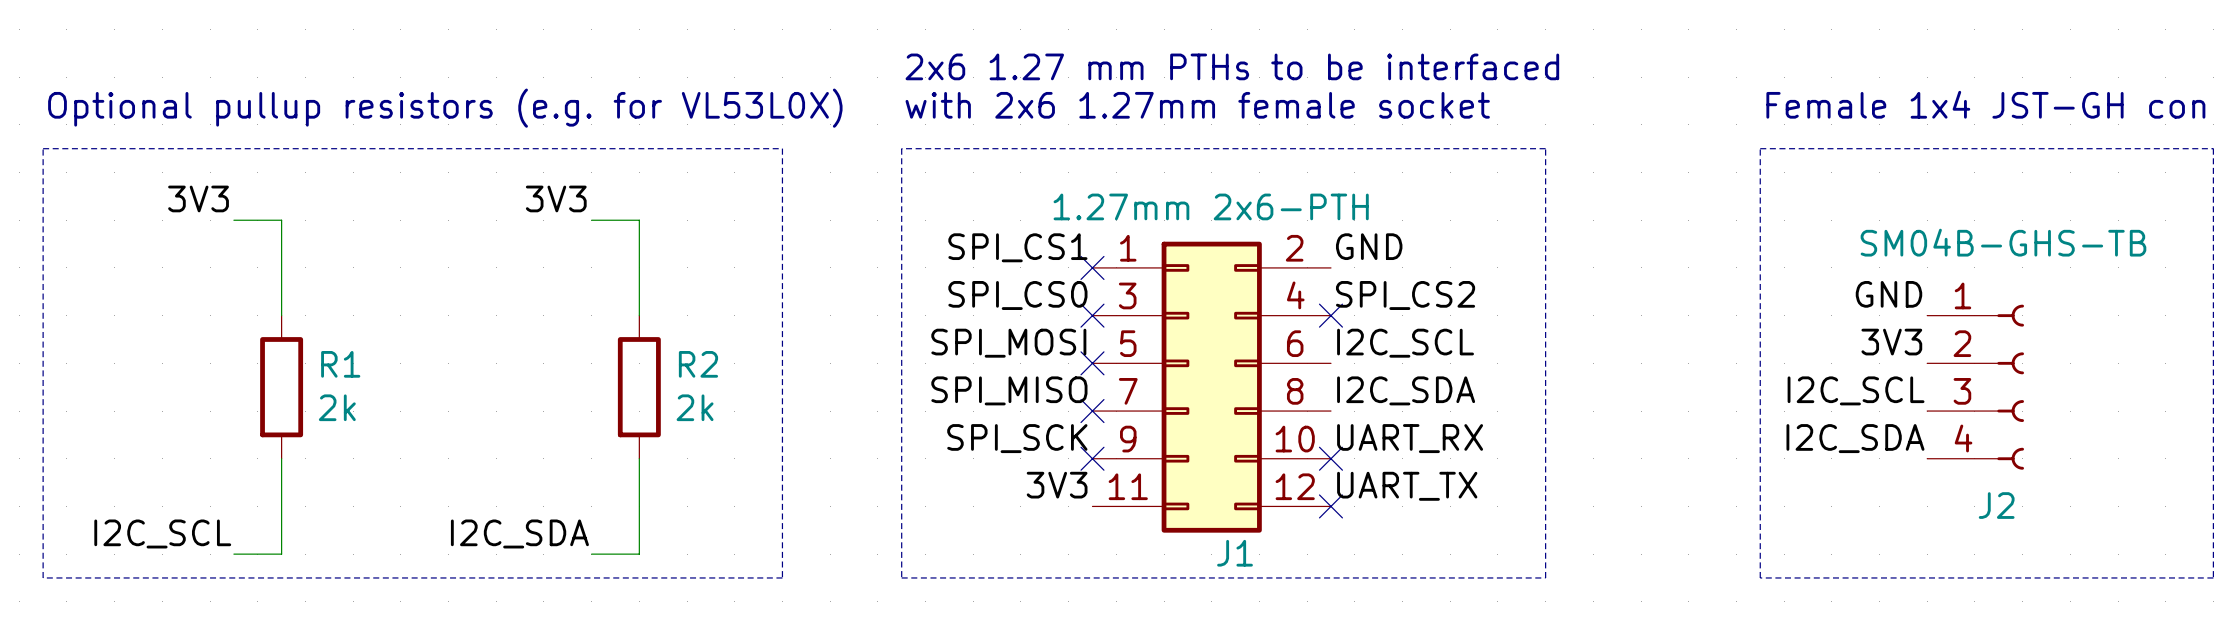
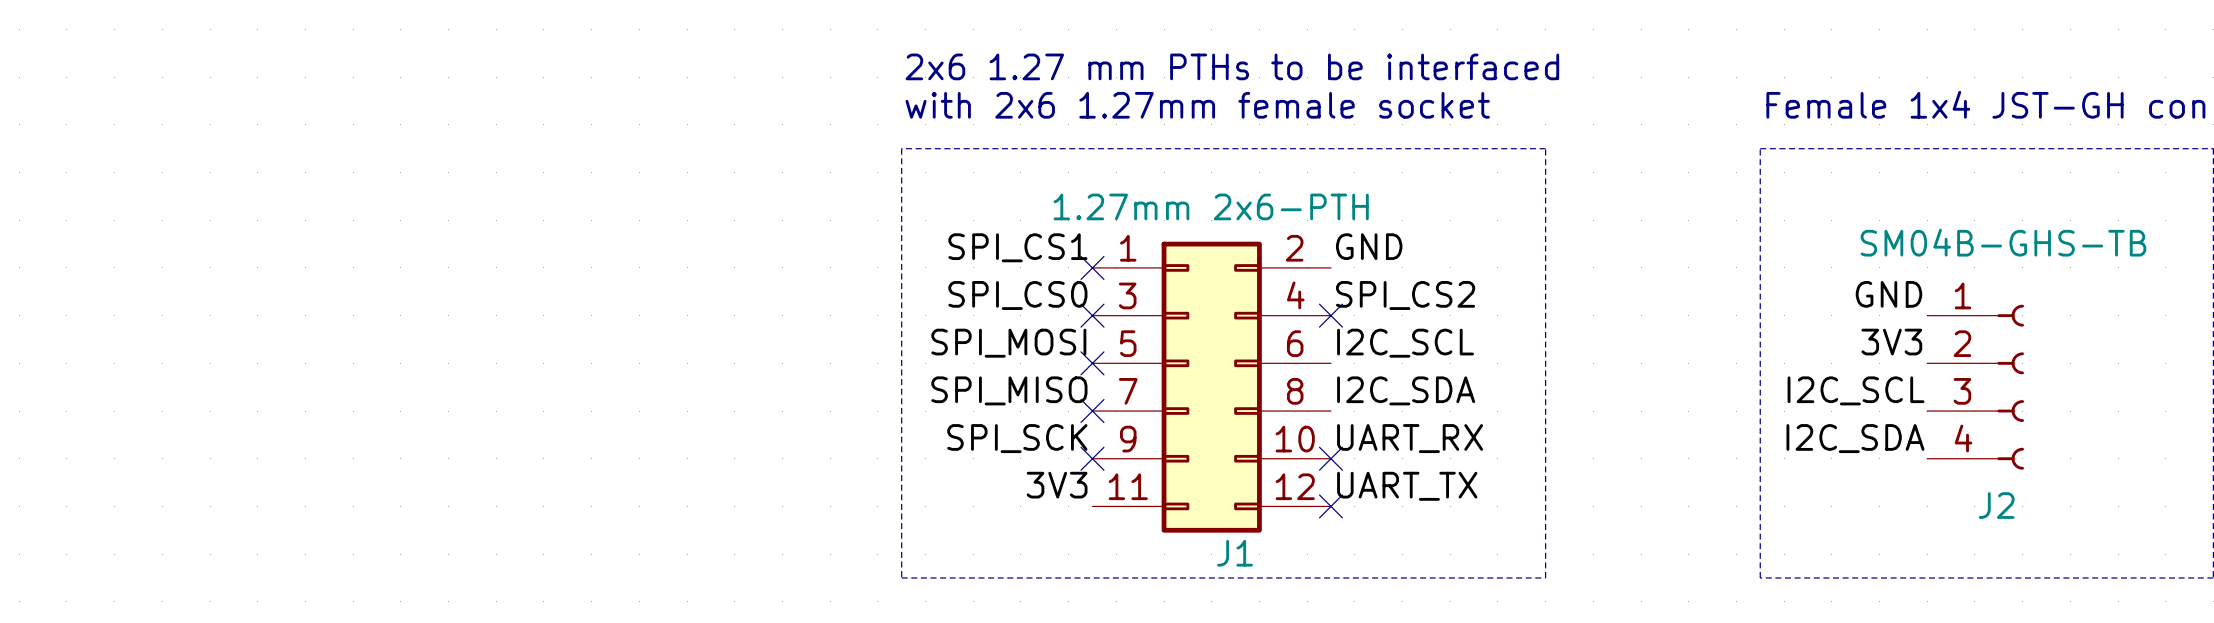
text: Optional pullup resistors (e.g. for VL53L0X) (445, 108) -> none
line: (43, 148) (43, 577) (782, 577) (782, 148) (43, 148) -> none
label: 3V3 (198, 198) -> none
label: 3V3 (556, 198) -> none
wire: (233, 220) (281, 220) (281, 315) -> none
wire: (591, 220) (639, 220) (639, 315) -> none
R1: 2k (281, 387) -> none
R2: 2k (639, 387) -> none
wire: (281, 458) (281, 554) (233, 554) -> none
wire: (639, 458) (639, 554) (591, 554) -> none
label: I2C_SCL (162, 533) -> none
label: I2C_SDA (519, 533) -> none

